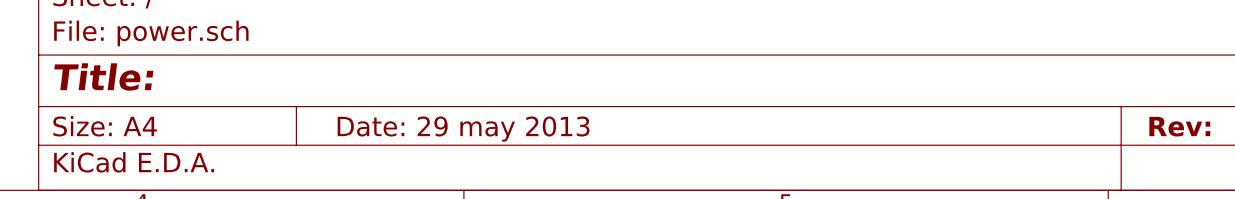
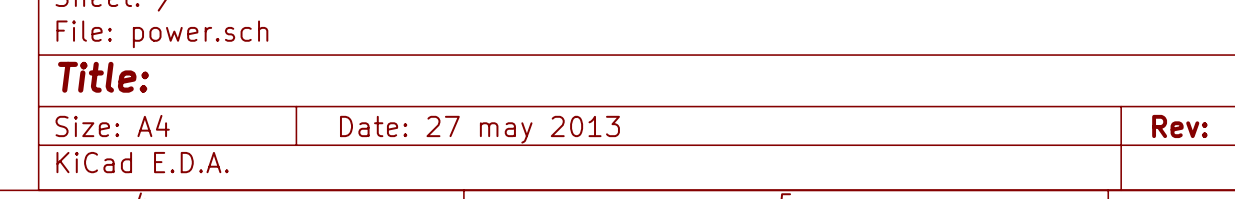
title block: Date: 29 may 2013 (463, 129) -> Date: 27 may 2013 (479, 129)

